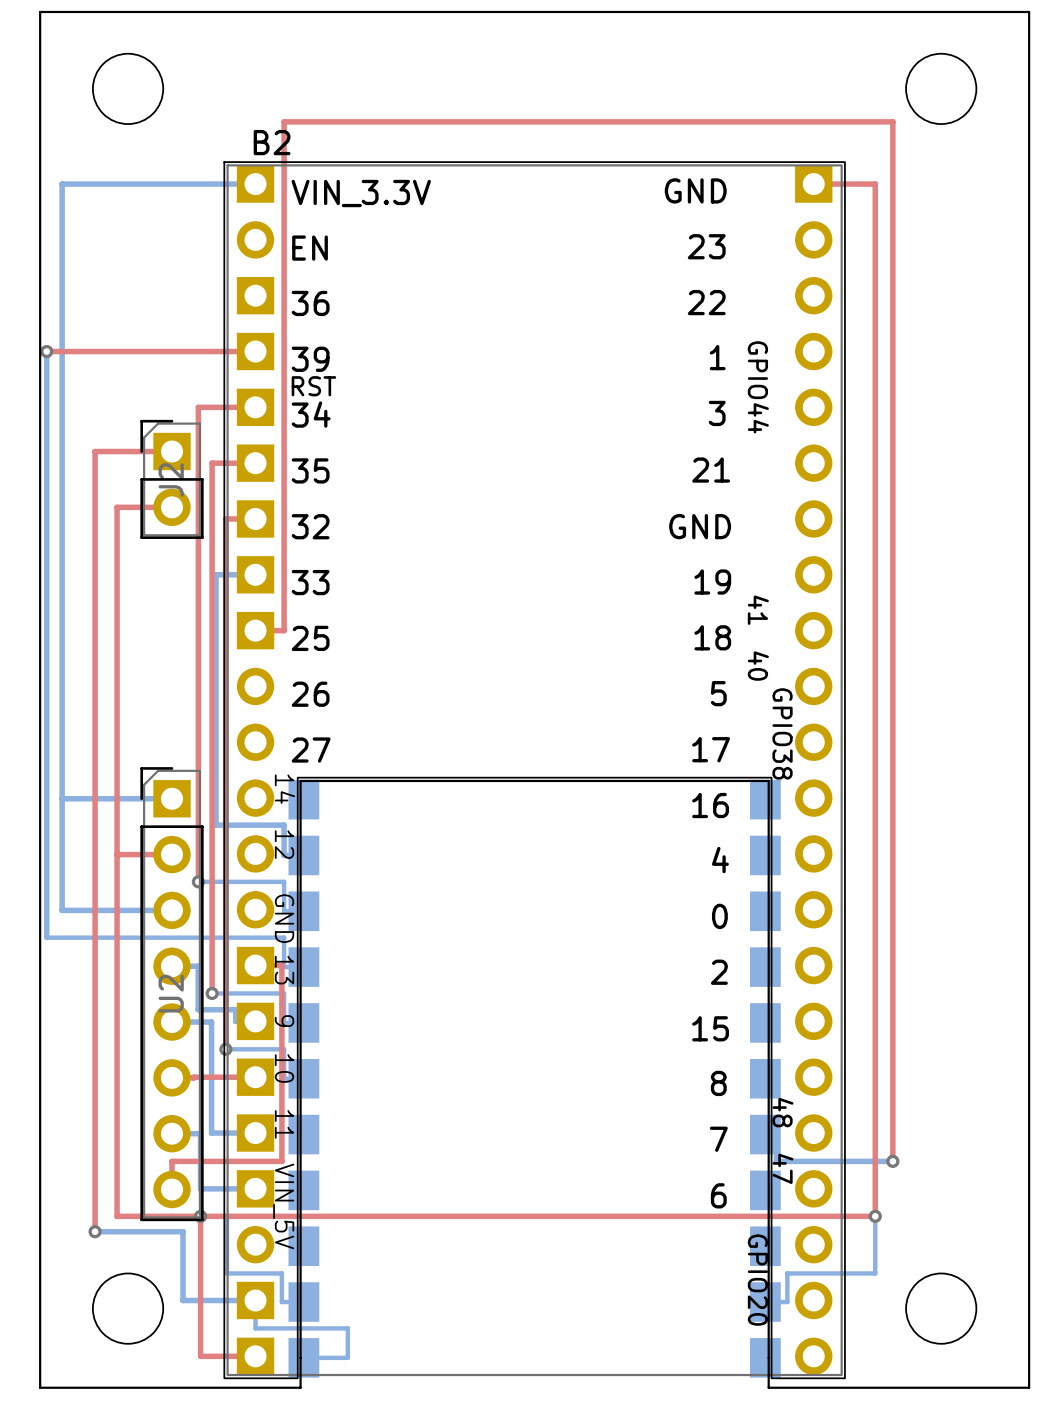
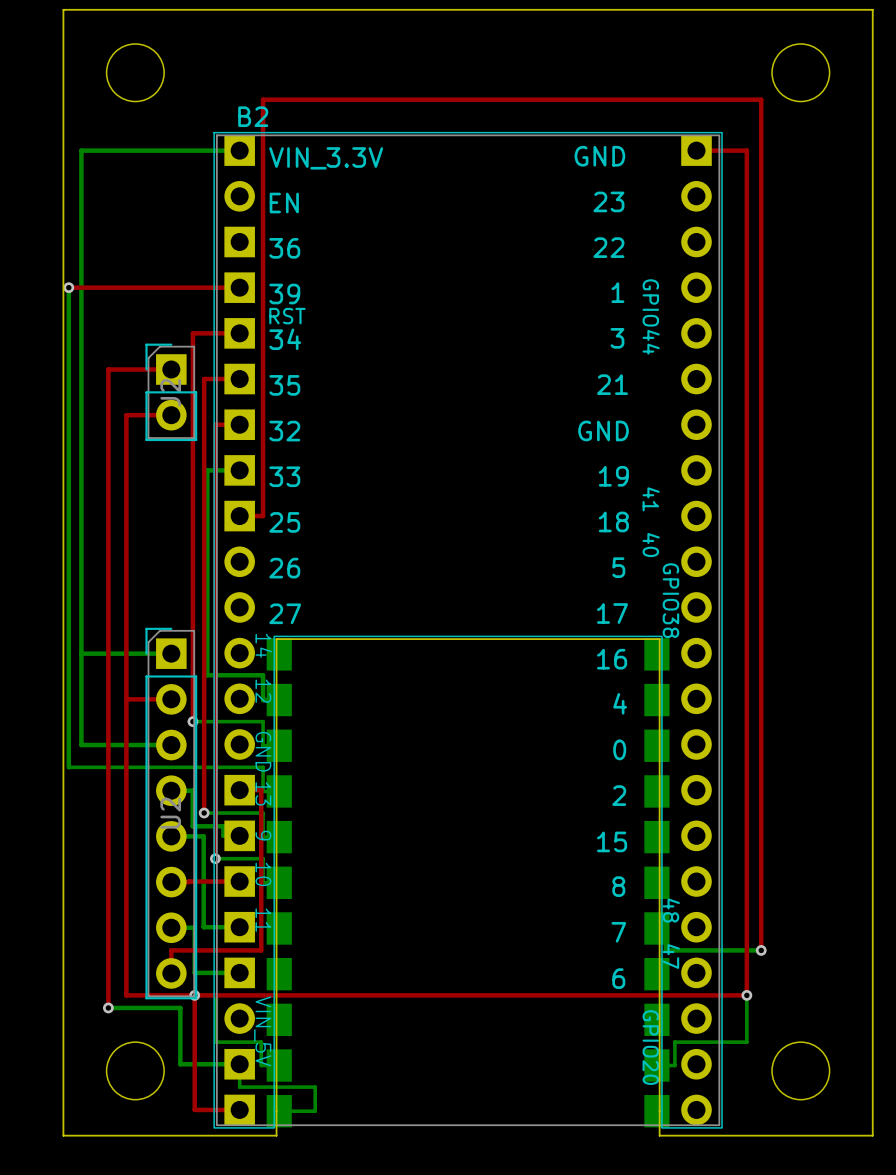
B2 text position: VIN_5V (283, 1206) -> VIN_5V (262, 1031)

